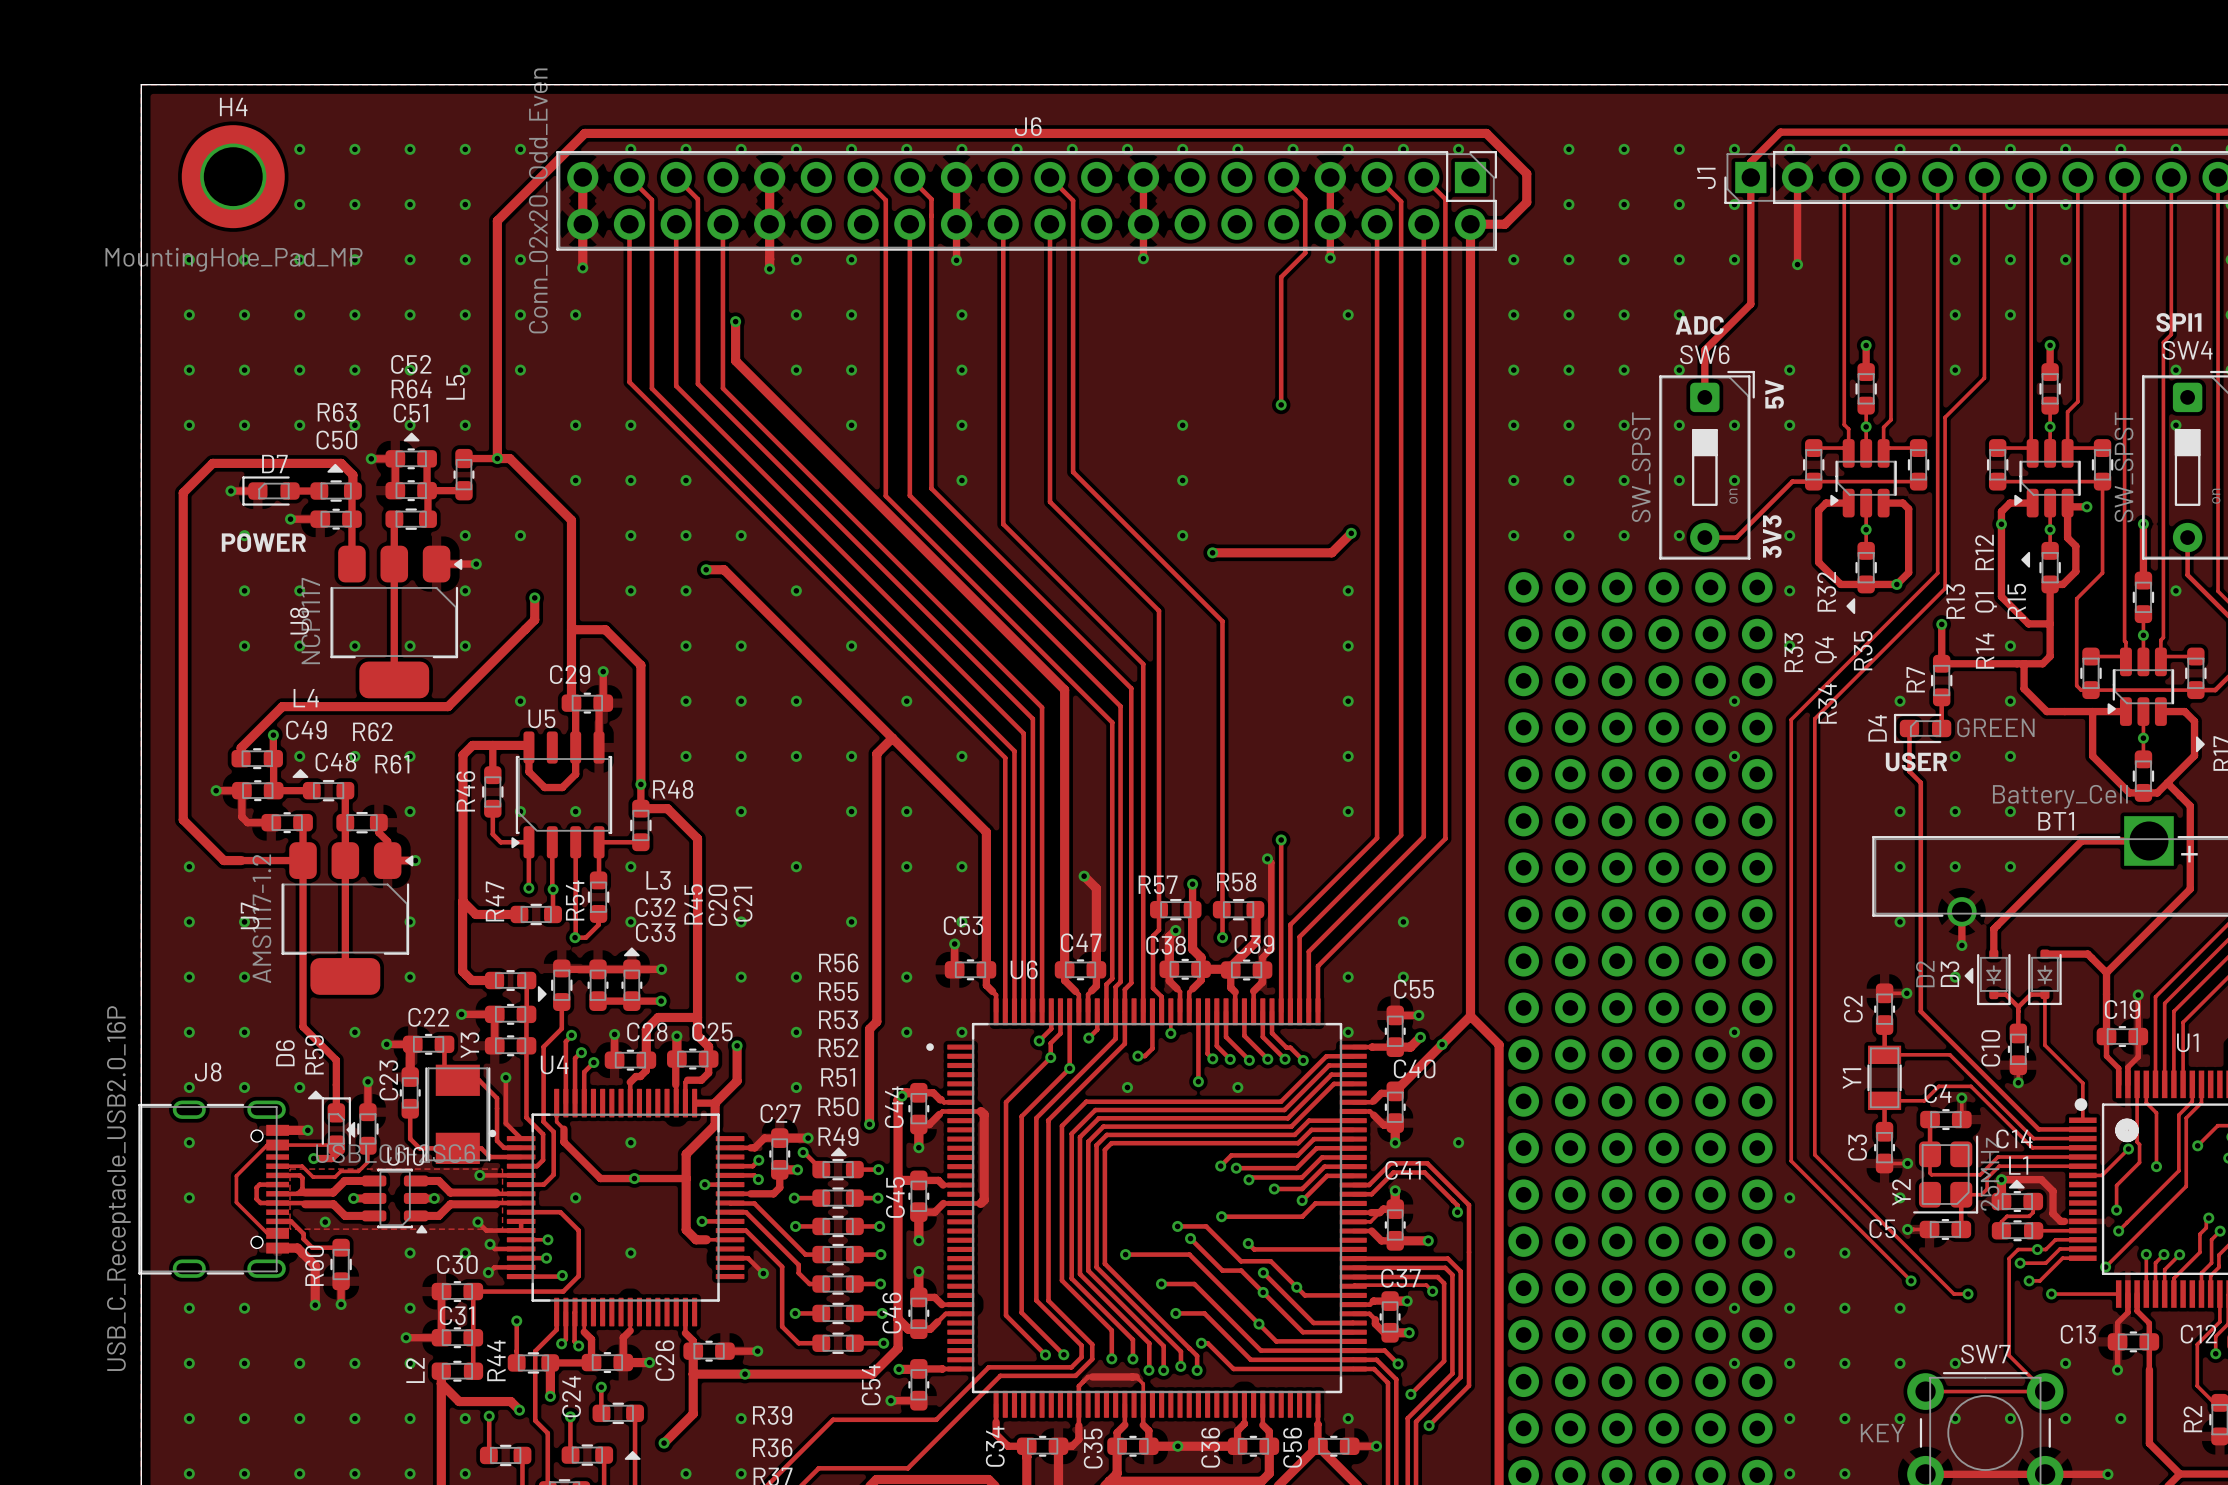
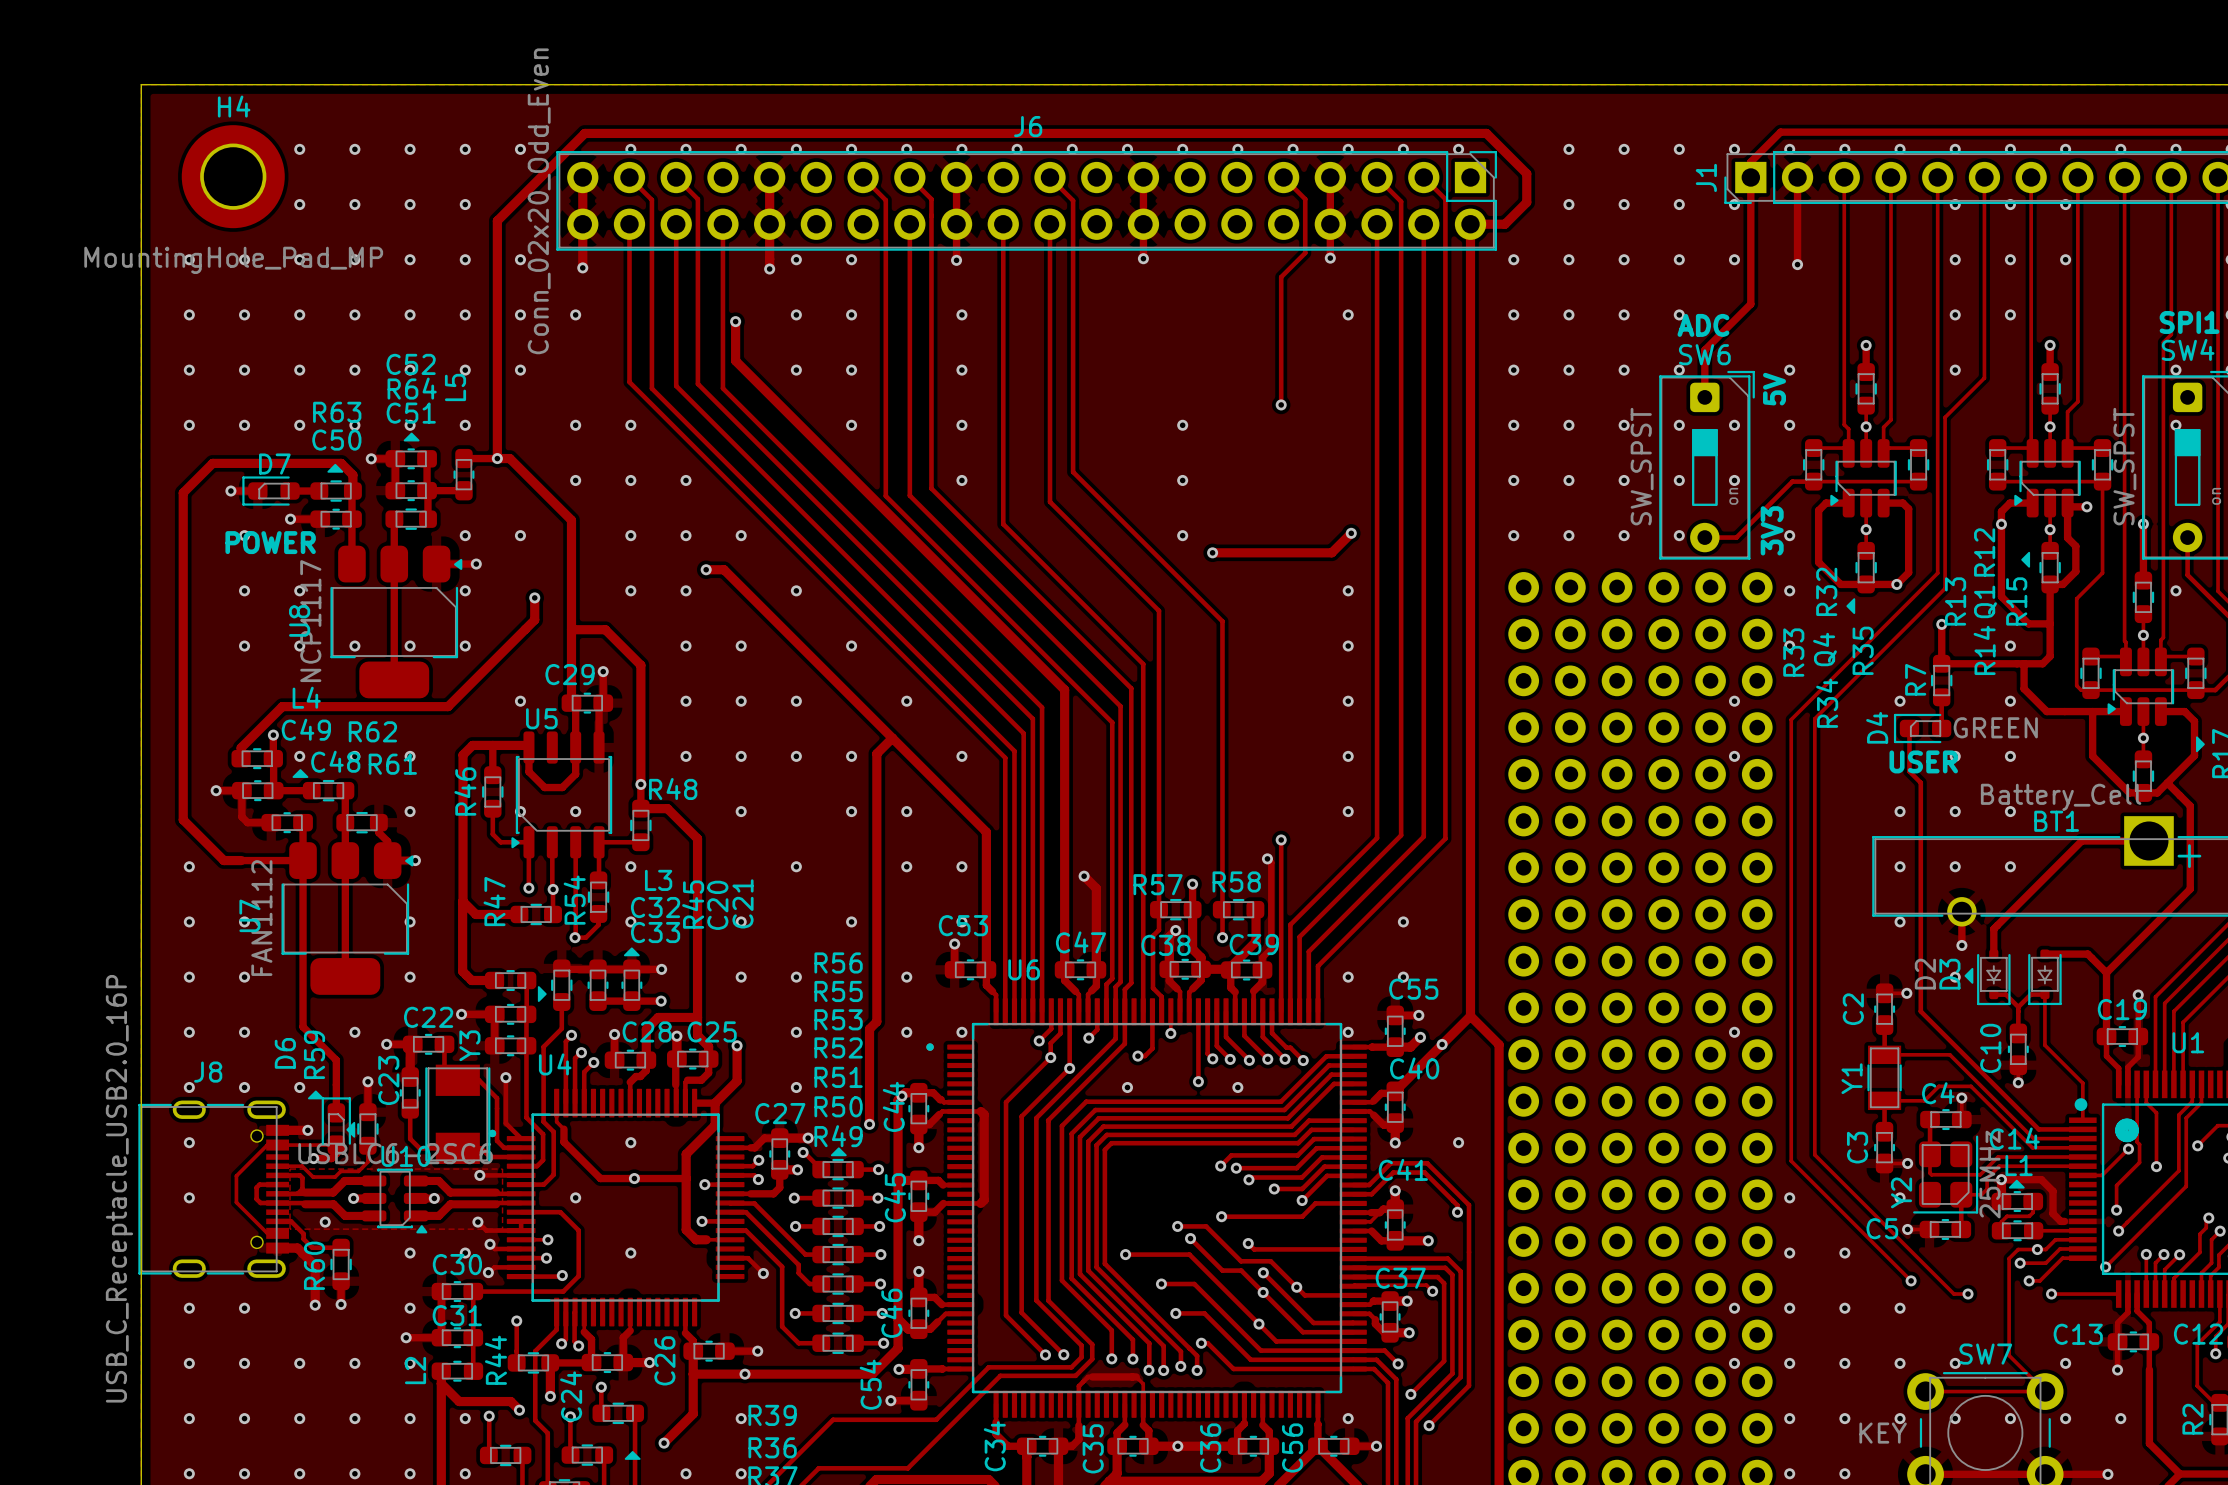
U7 value: AMS1117-1.2 (261, 918) -> FAN1112 (261, 918)

